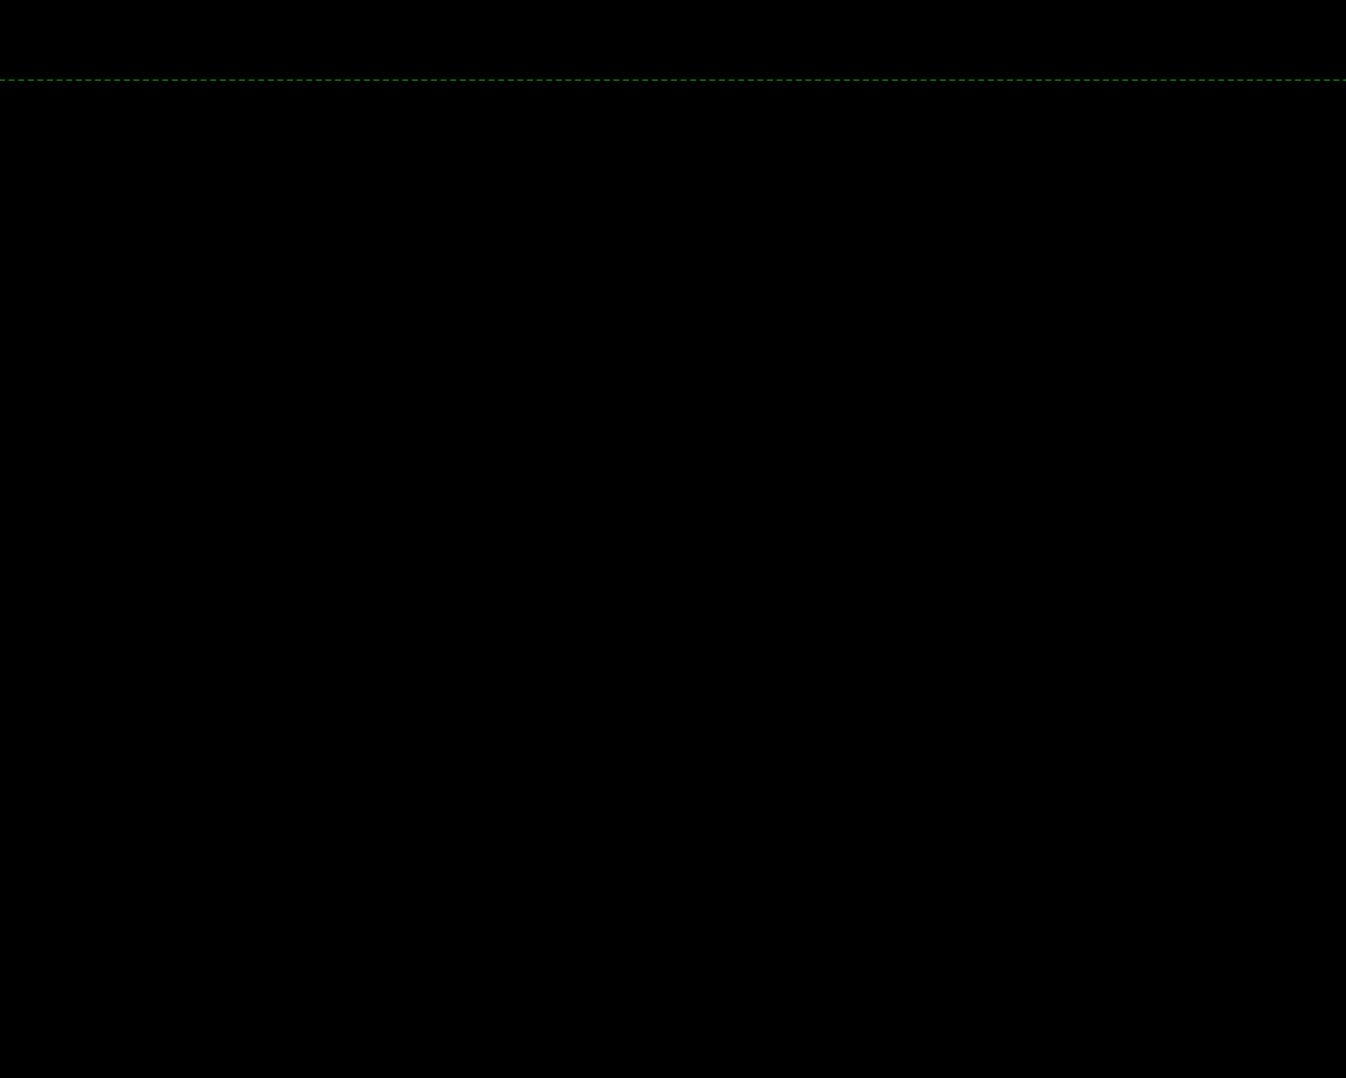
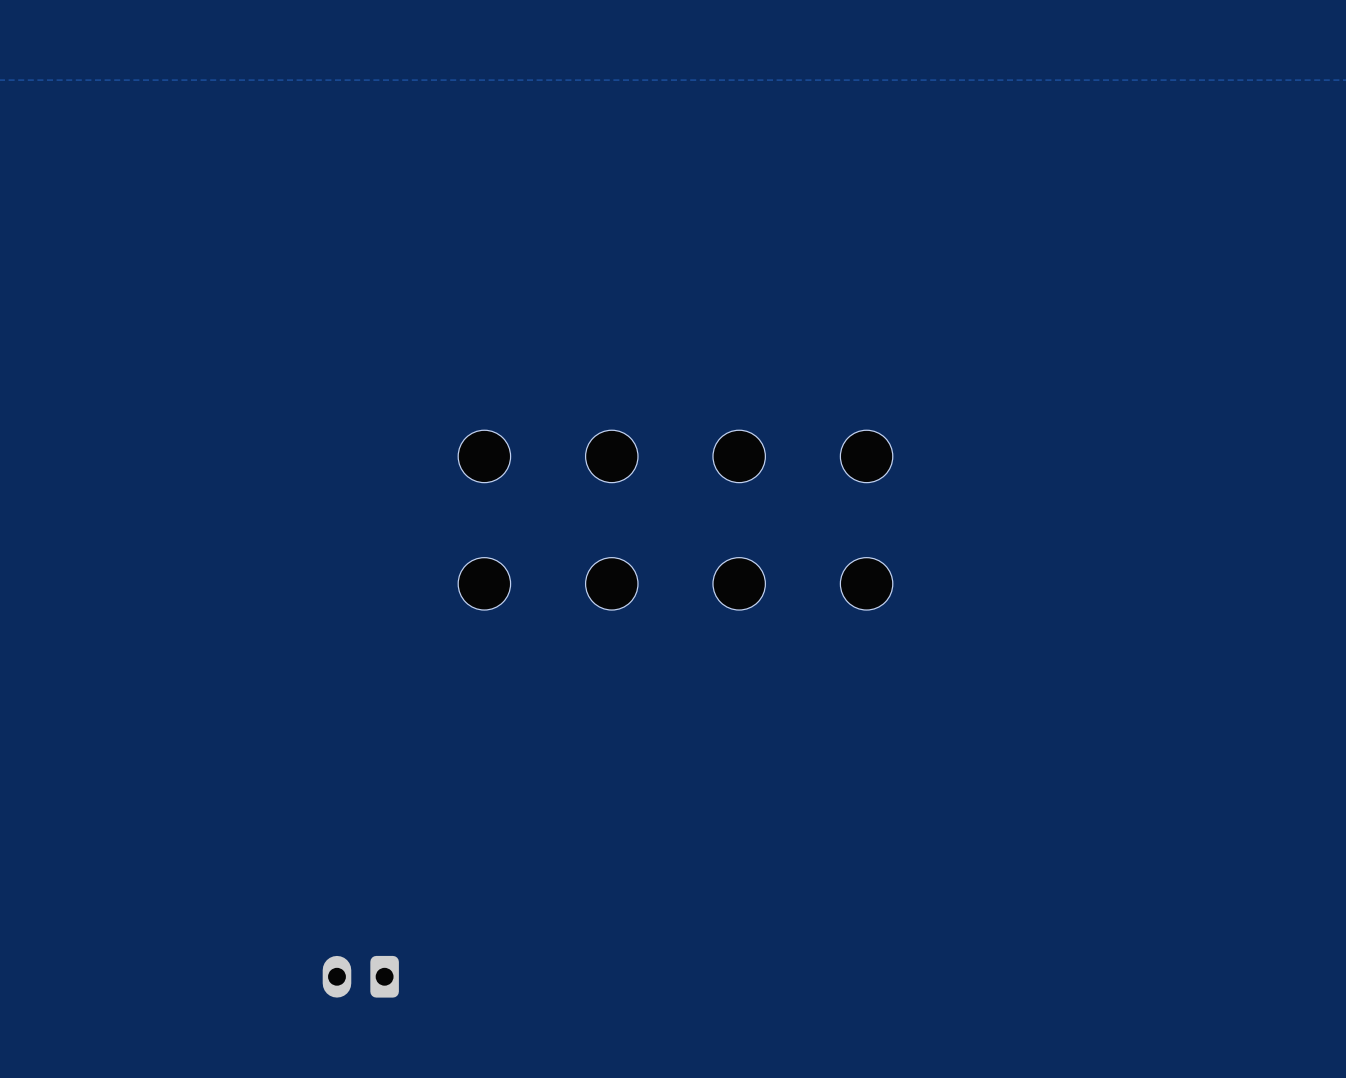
part: none -> (484, 456)
part: none -> (611, 456)
part: none -> (739, 456)
part: none -> (866, 456)
part: none -> (484, 583)
part: none -> (611, 583)
part: none -> (739, 583)
part: none -> (866, 583)
part: none -> (360, 976)

